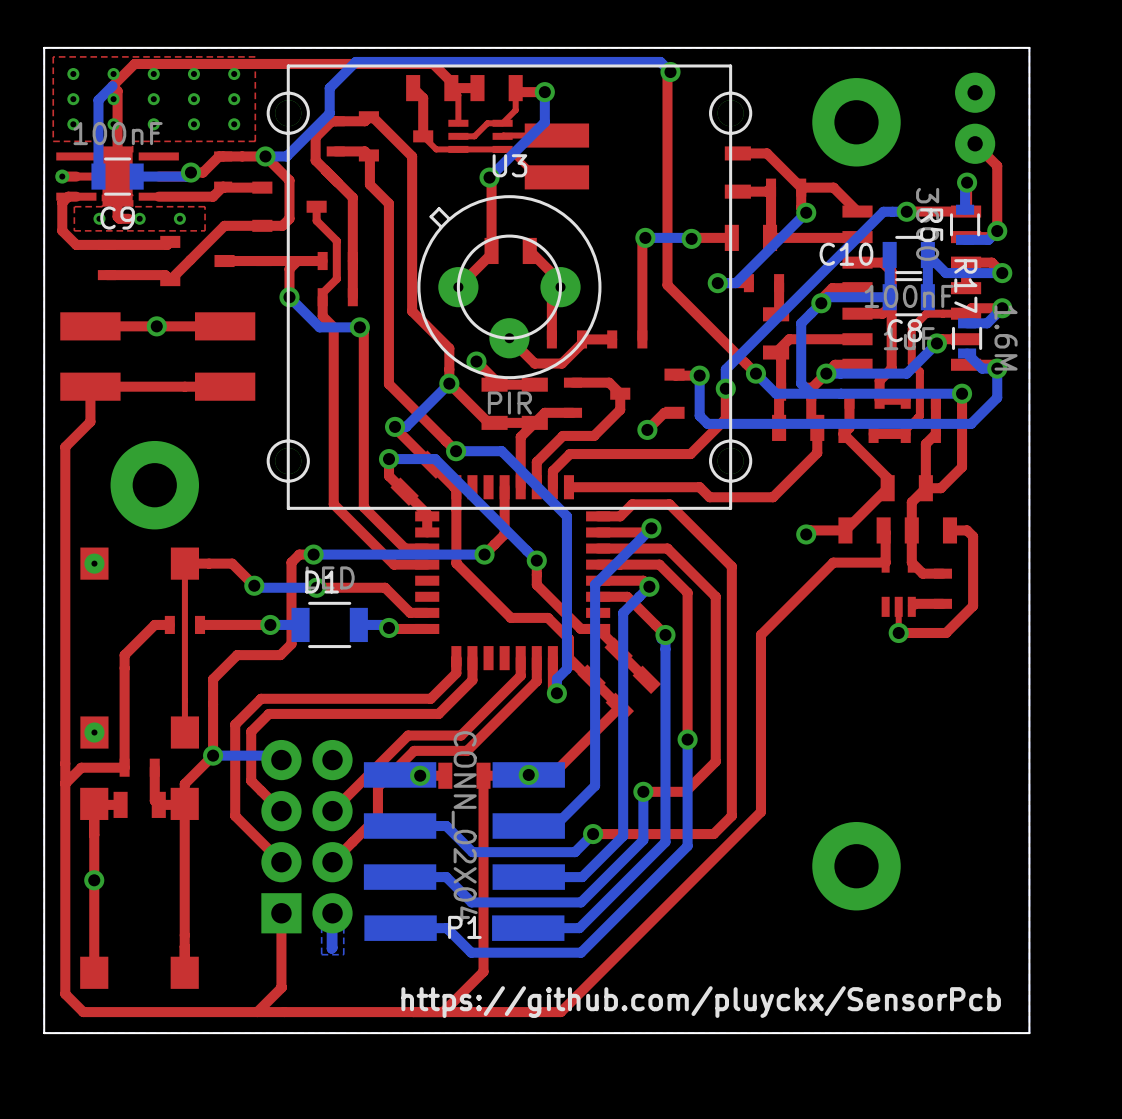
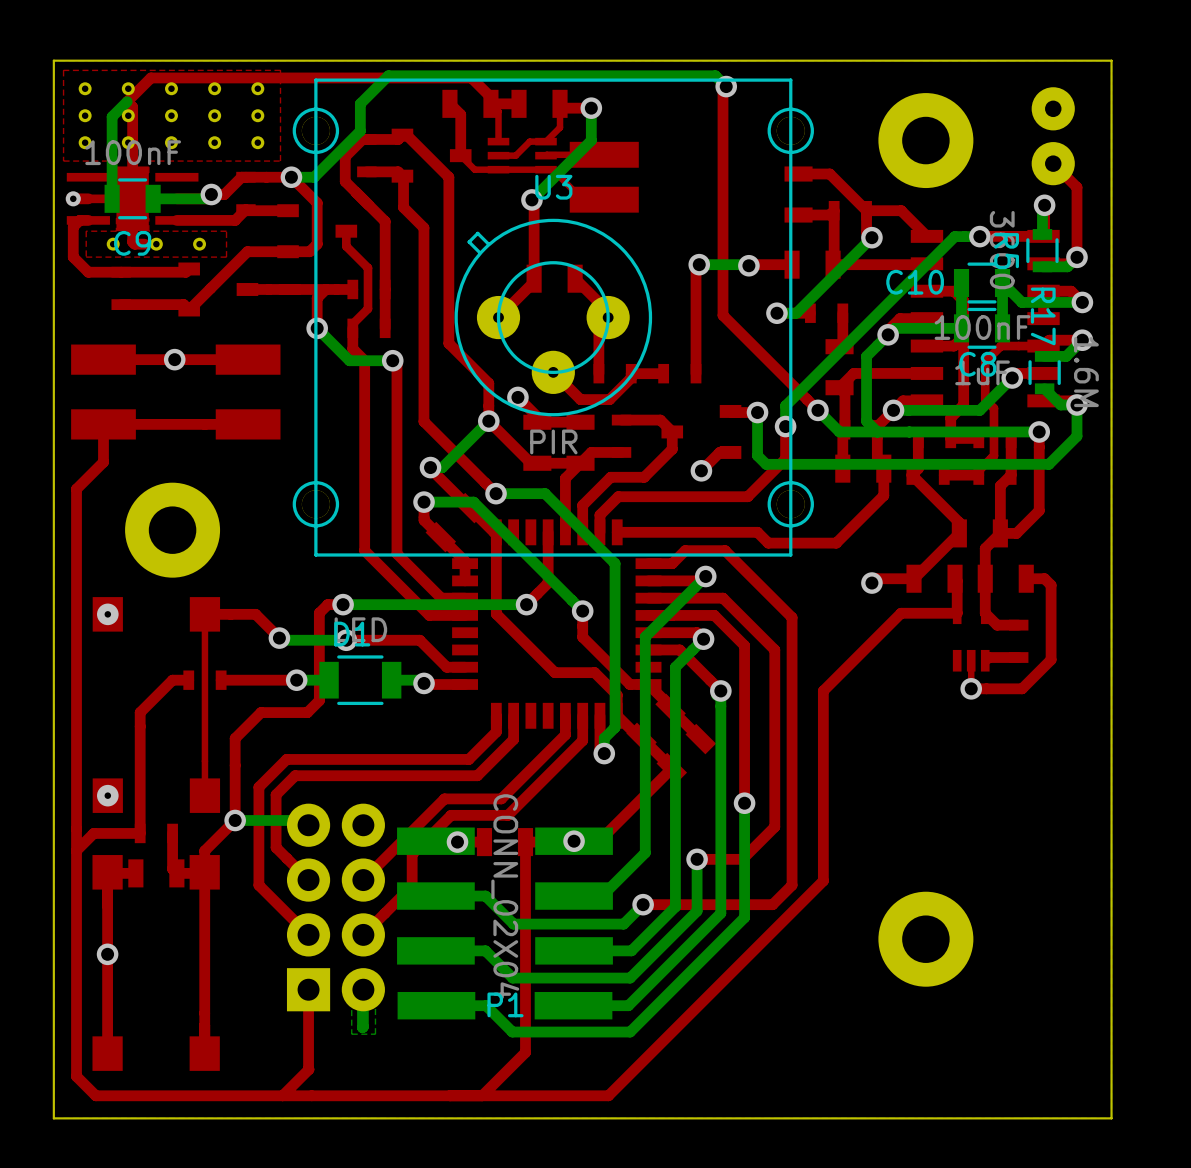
text: https://github.com/pluyckx/SensorPcb (701, 1002) -> none

